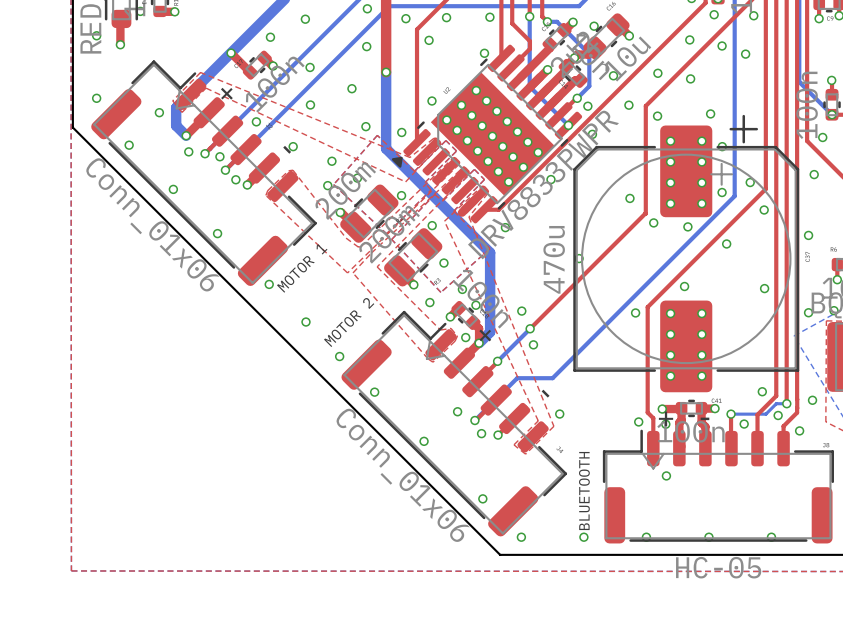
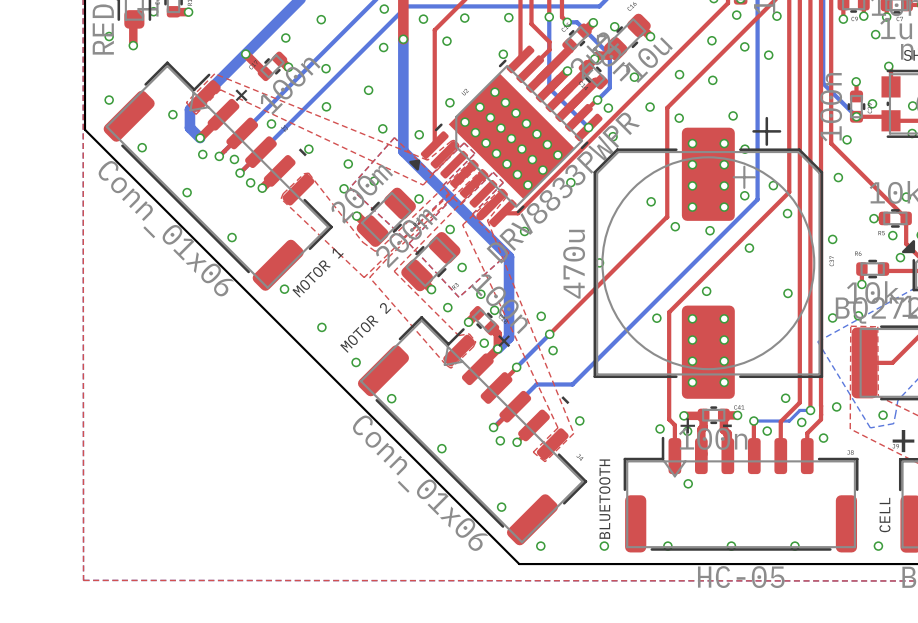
top track: (386, 38) (386, 72) -> none
bottom track: none -> (403, 39) (403, 73)
via: none -> (403, 39)
via: (386, 72) -> none
via: (457, 411) -> none

